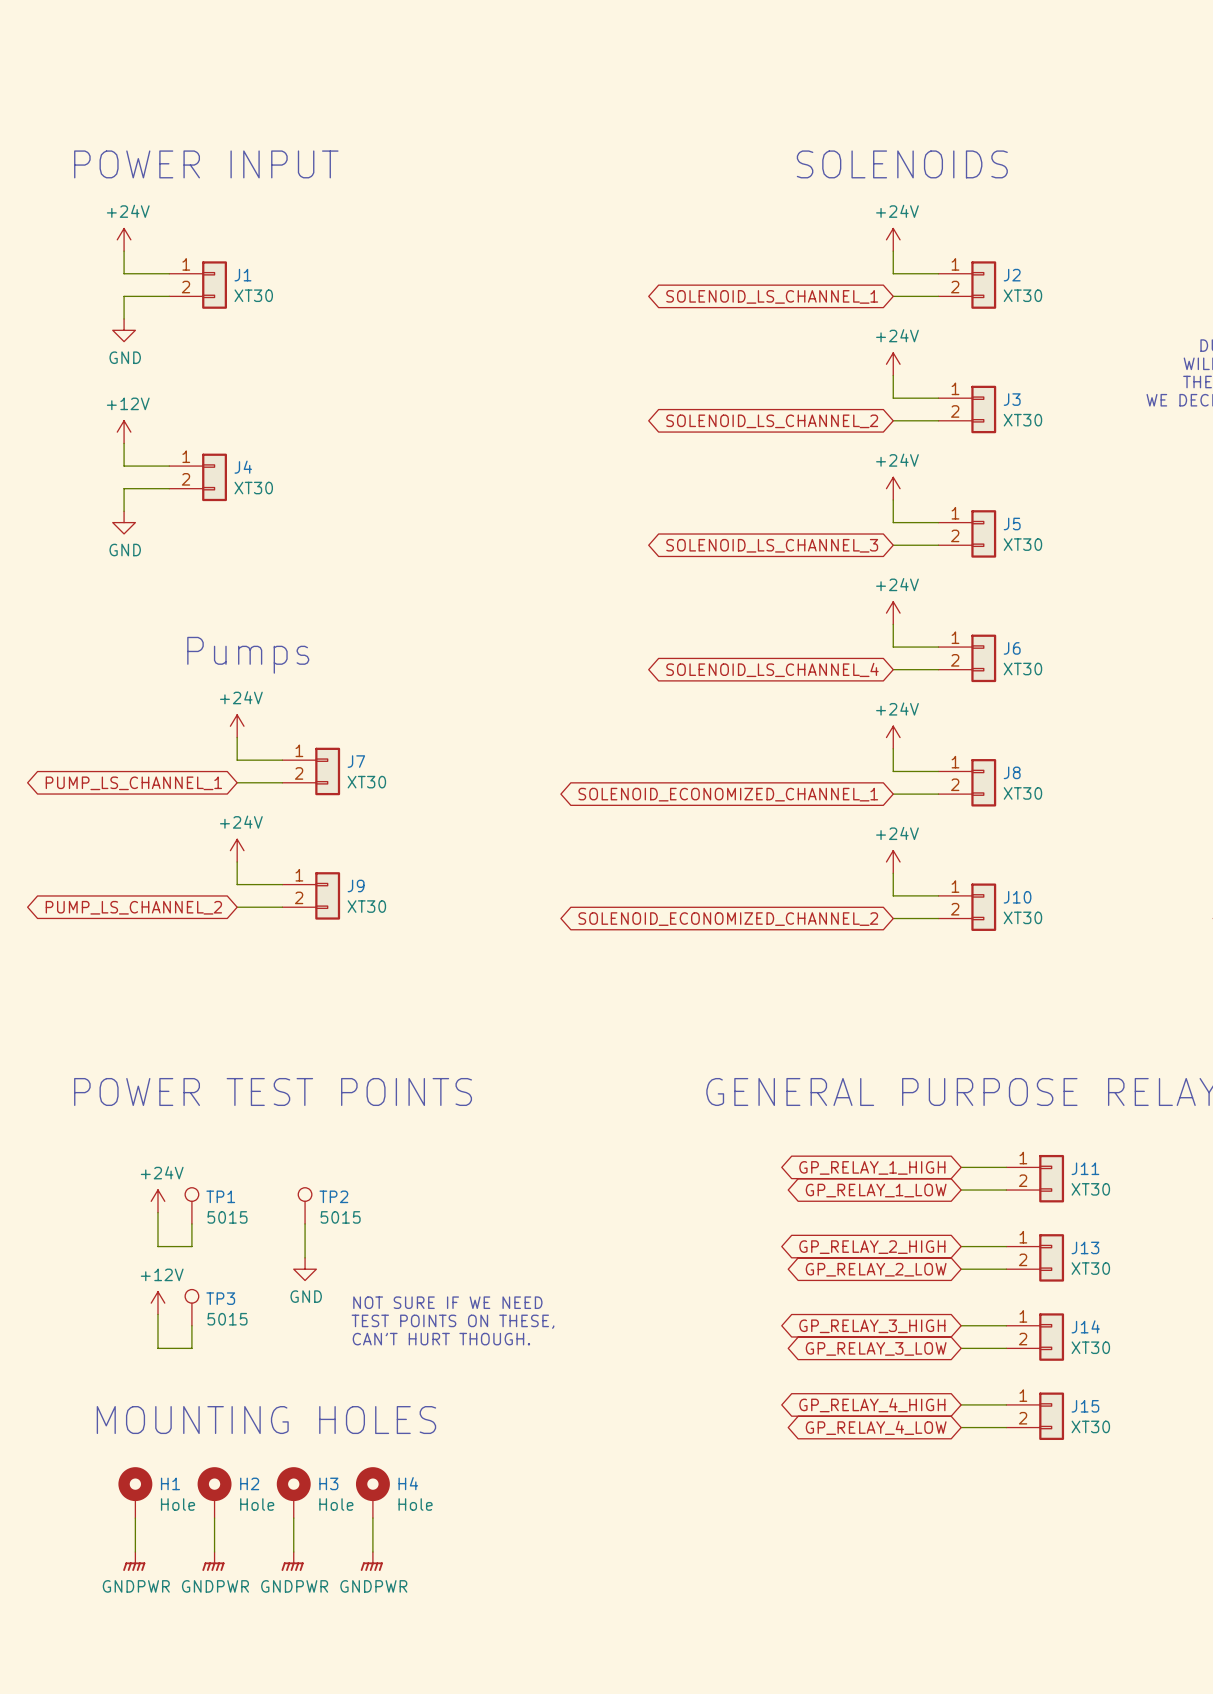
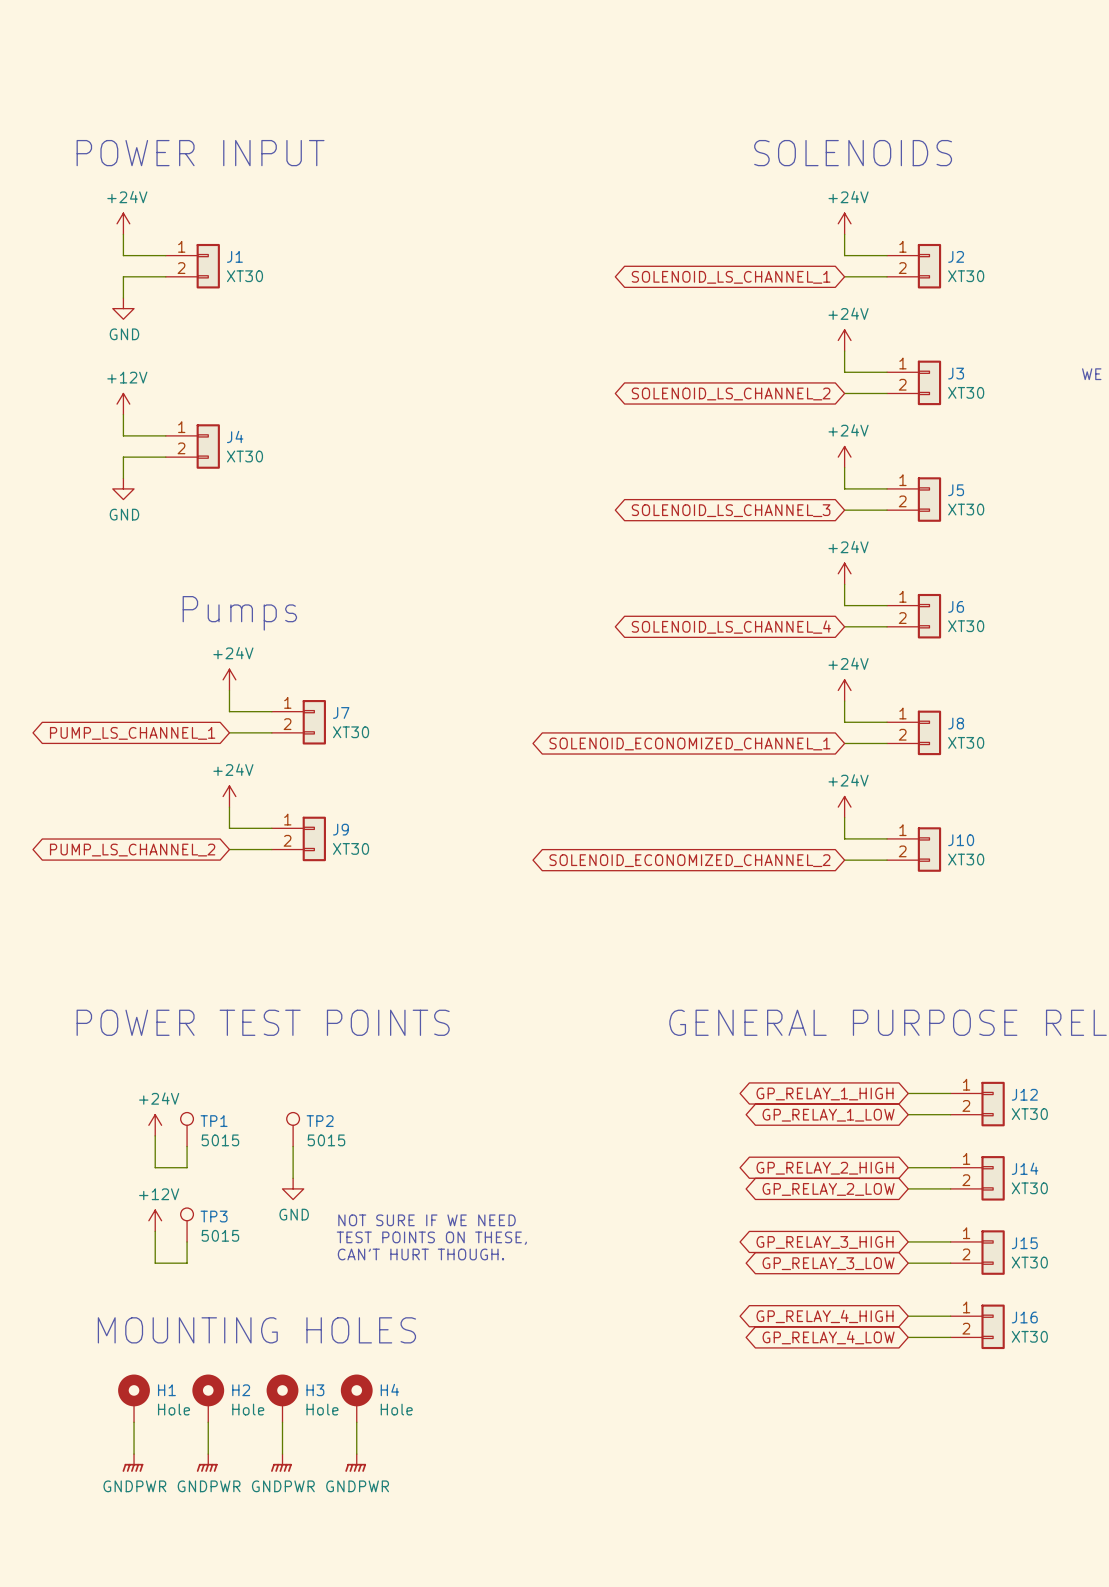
J11 name: J11 (1085, 1168) -> J12 (1024, 1094)
J13 name: J13 (1085, 1247) -> J14 (1025, 1168)
J14 name: J14 (1085, 1326) -> J15 (1024, 1243)
J15 name: J15 (1085, 1406) -> J16 (1024, 1317)

